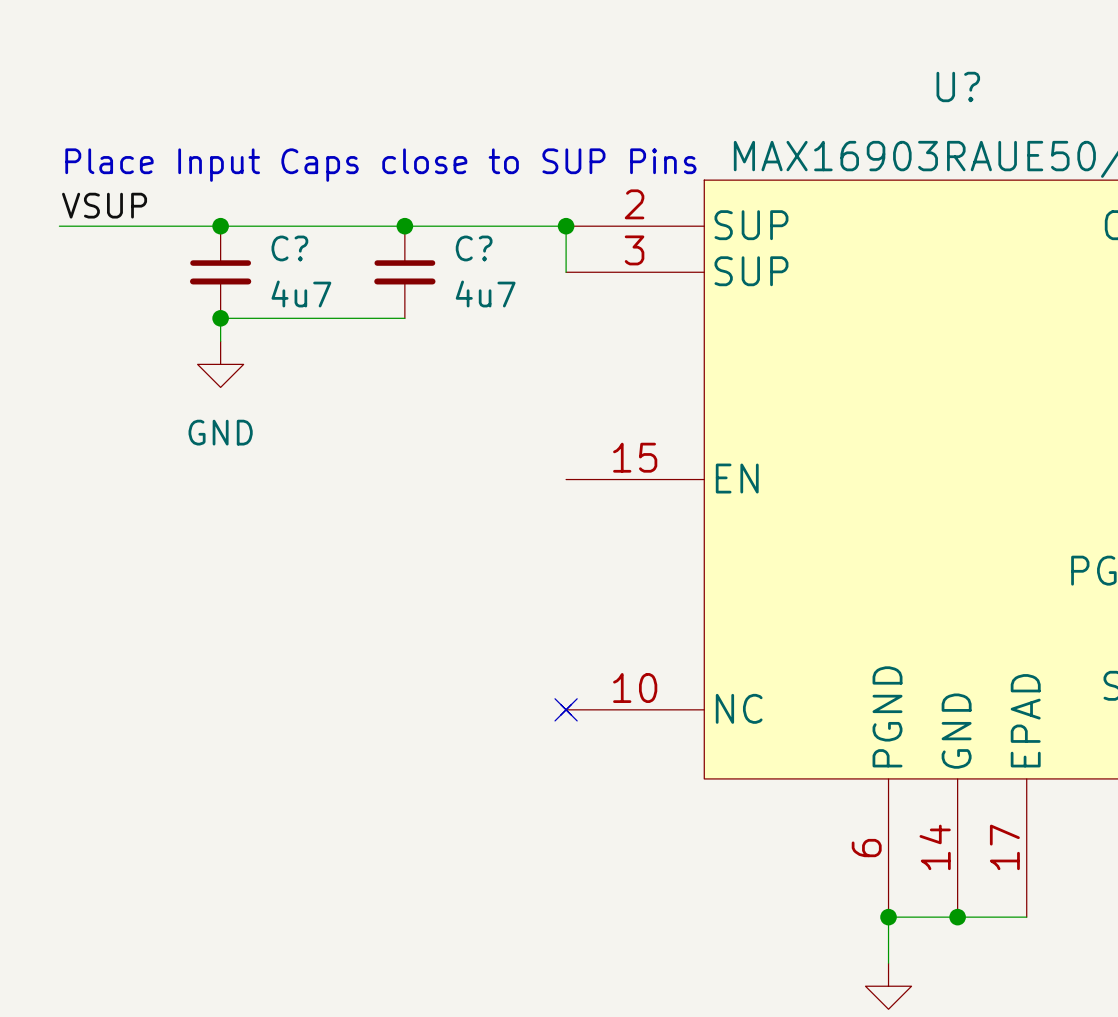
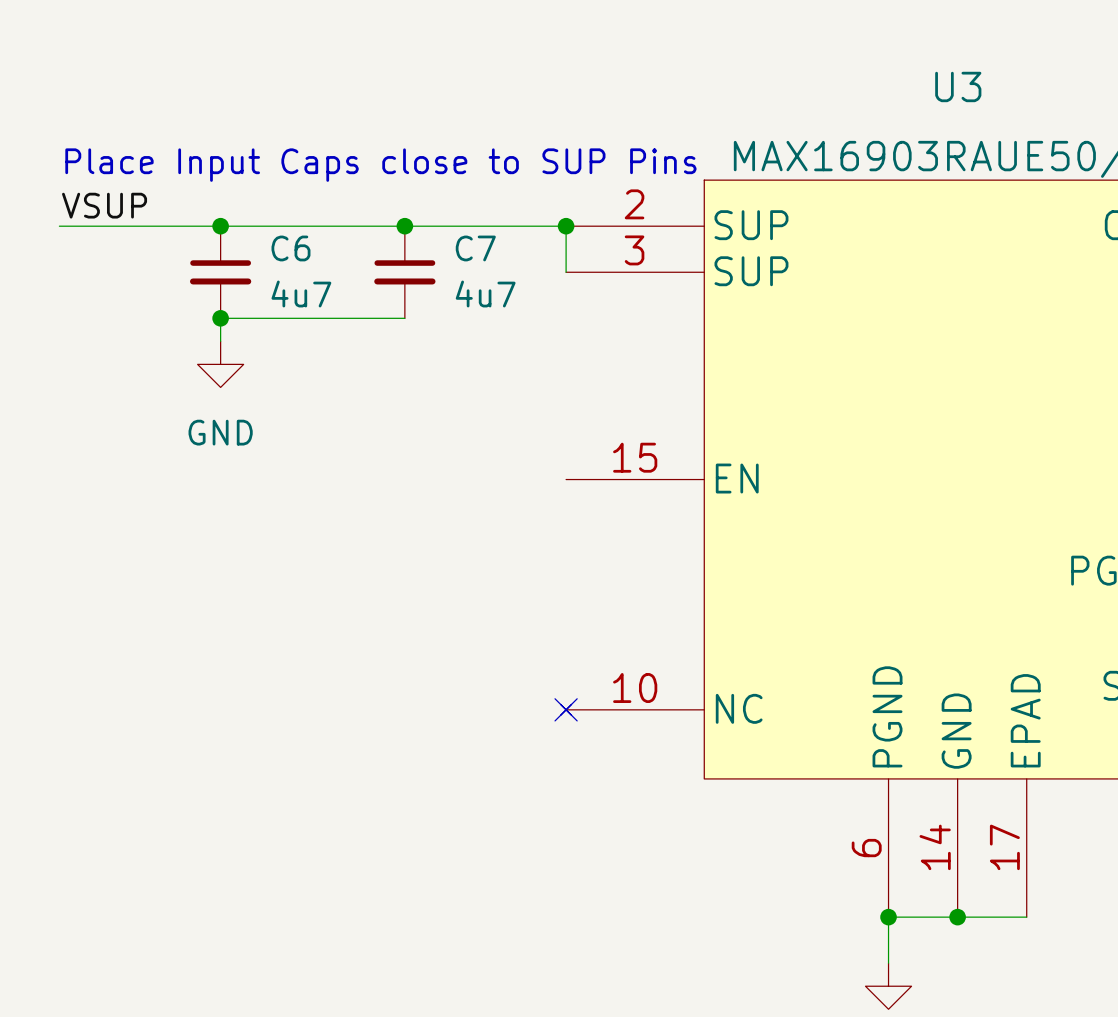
U? name: U? (958, 86) -> U3 (958, 86)
C? name: C? (289, 248) -> C6 (290, 248)
C? name: C? (474, 248) -> C7 (475, 248)

